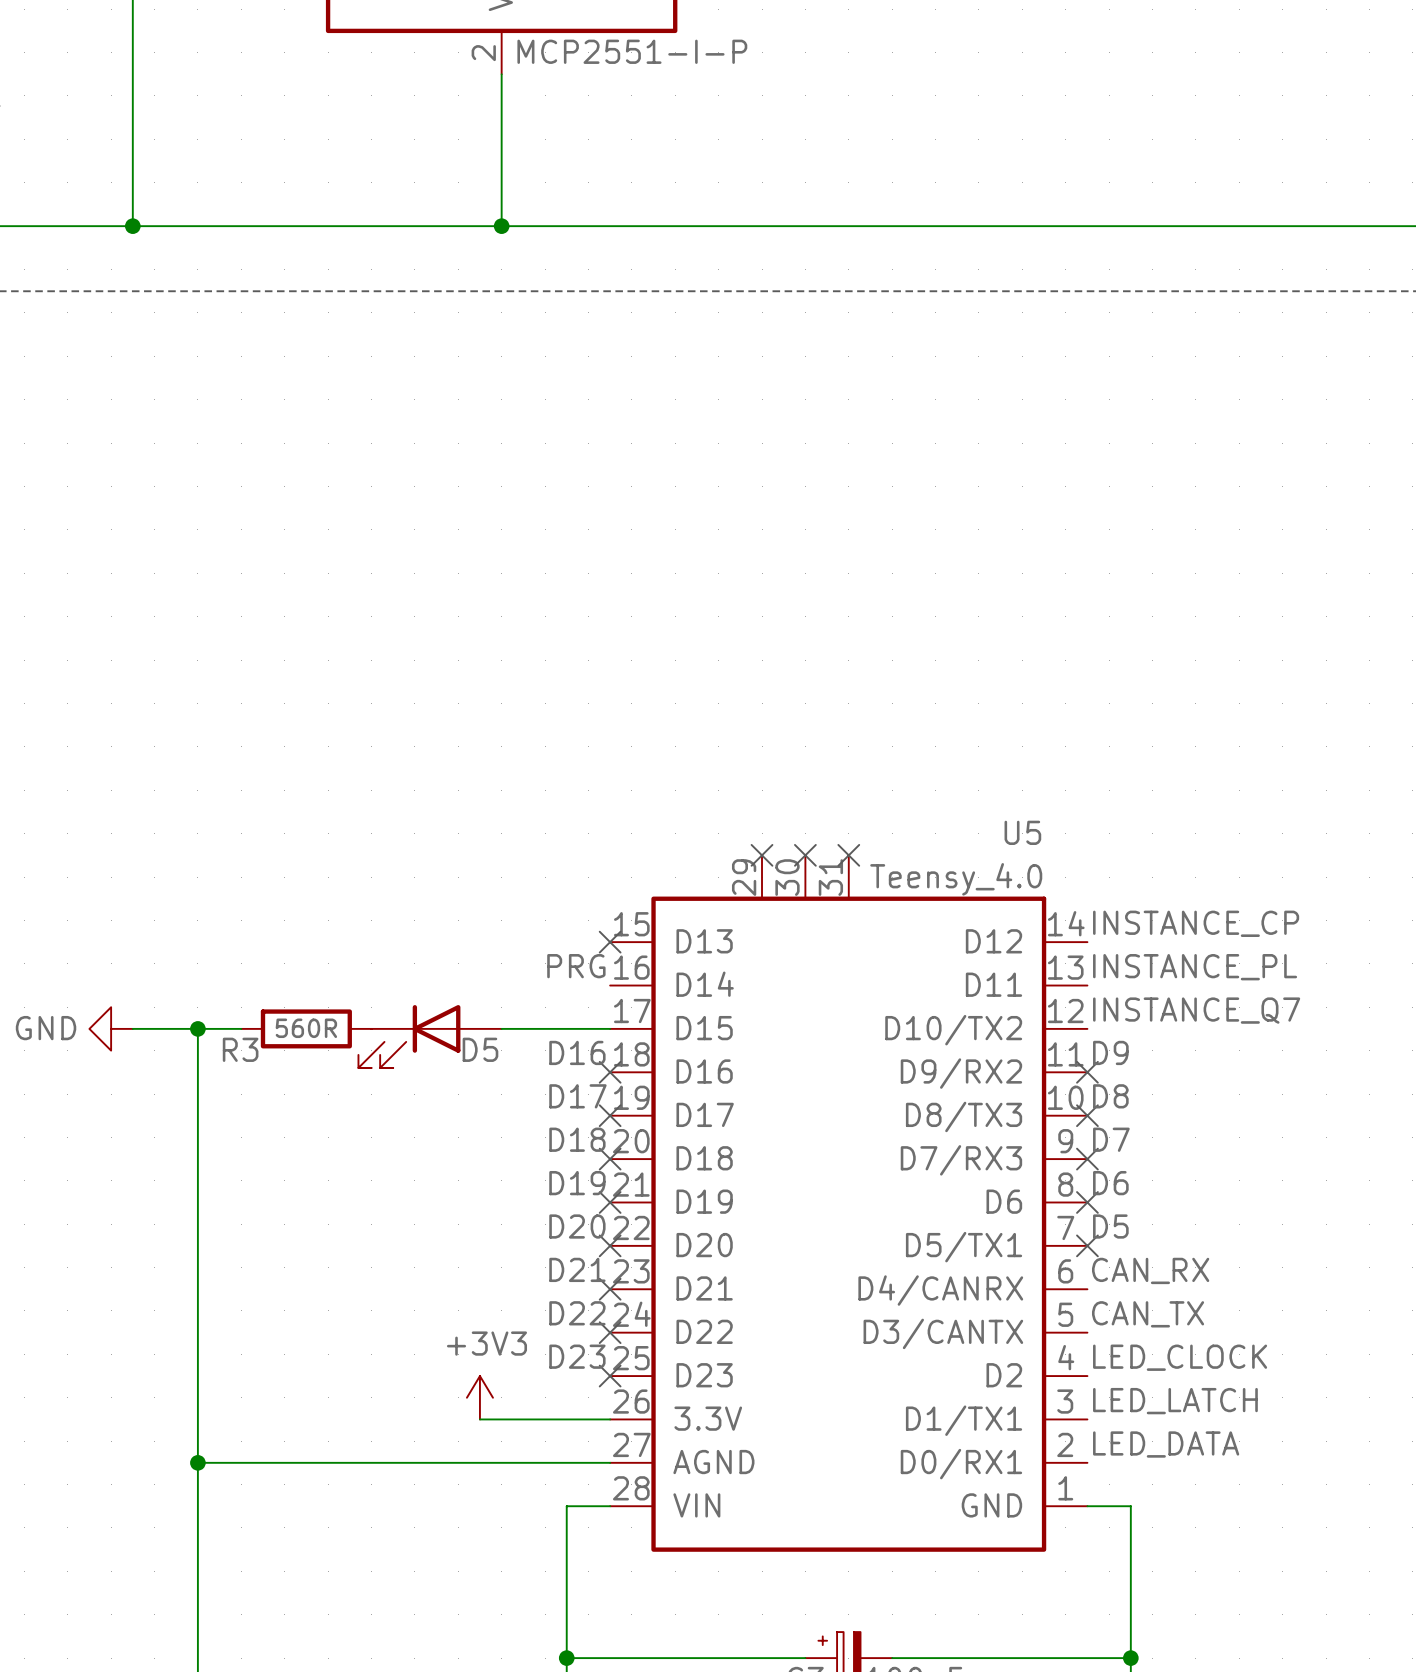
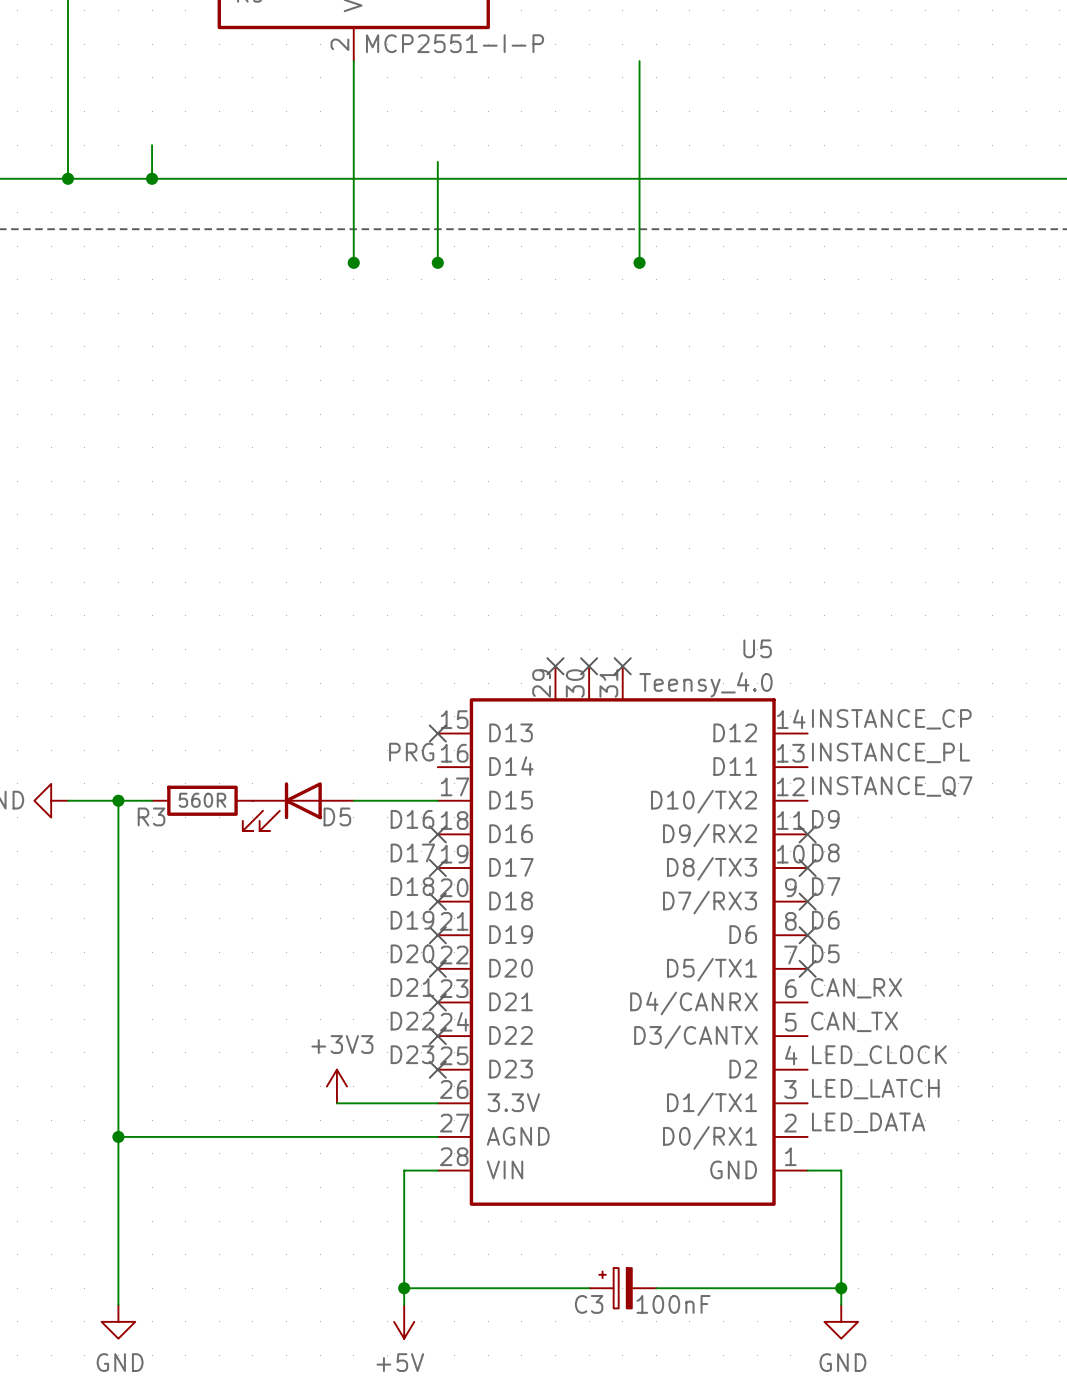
wire: none -> (639, 61) (639, 262)
wire: none -> (152, 145) (152, 178)
wire: none -> (437, 161) (437, 262)
junction: none -> (152, 178)
wire: none -> (353, 178) (353, 262)
junction: (501, 226) -> none
junction: none -> (353, 262)
junction: none -> (437, 262)
junction: none -> (639, 262)

